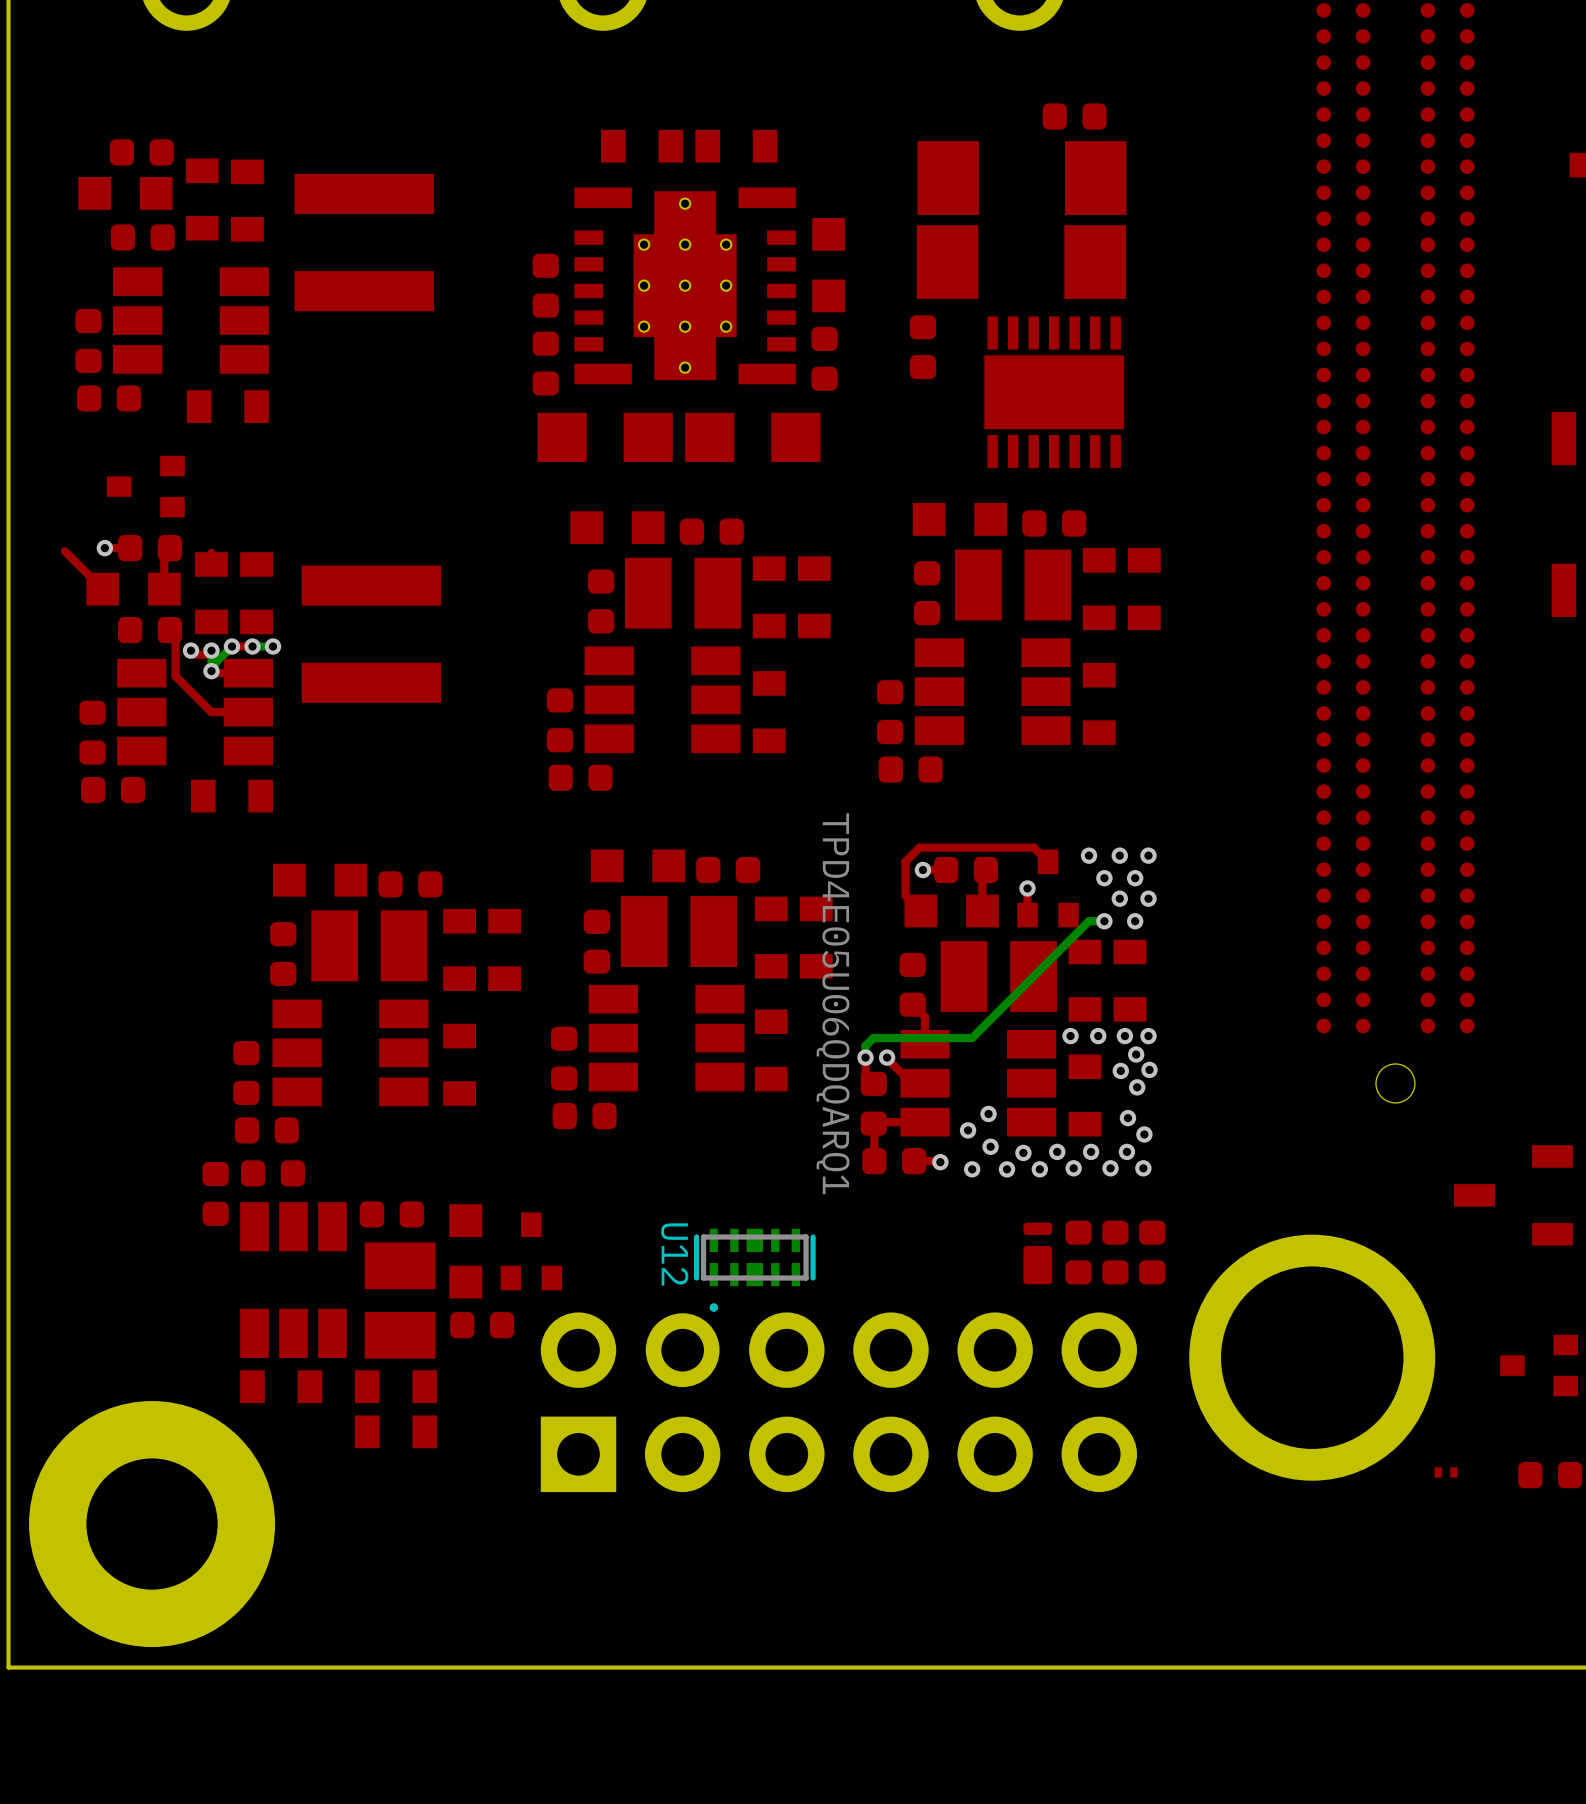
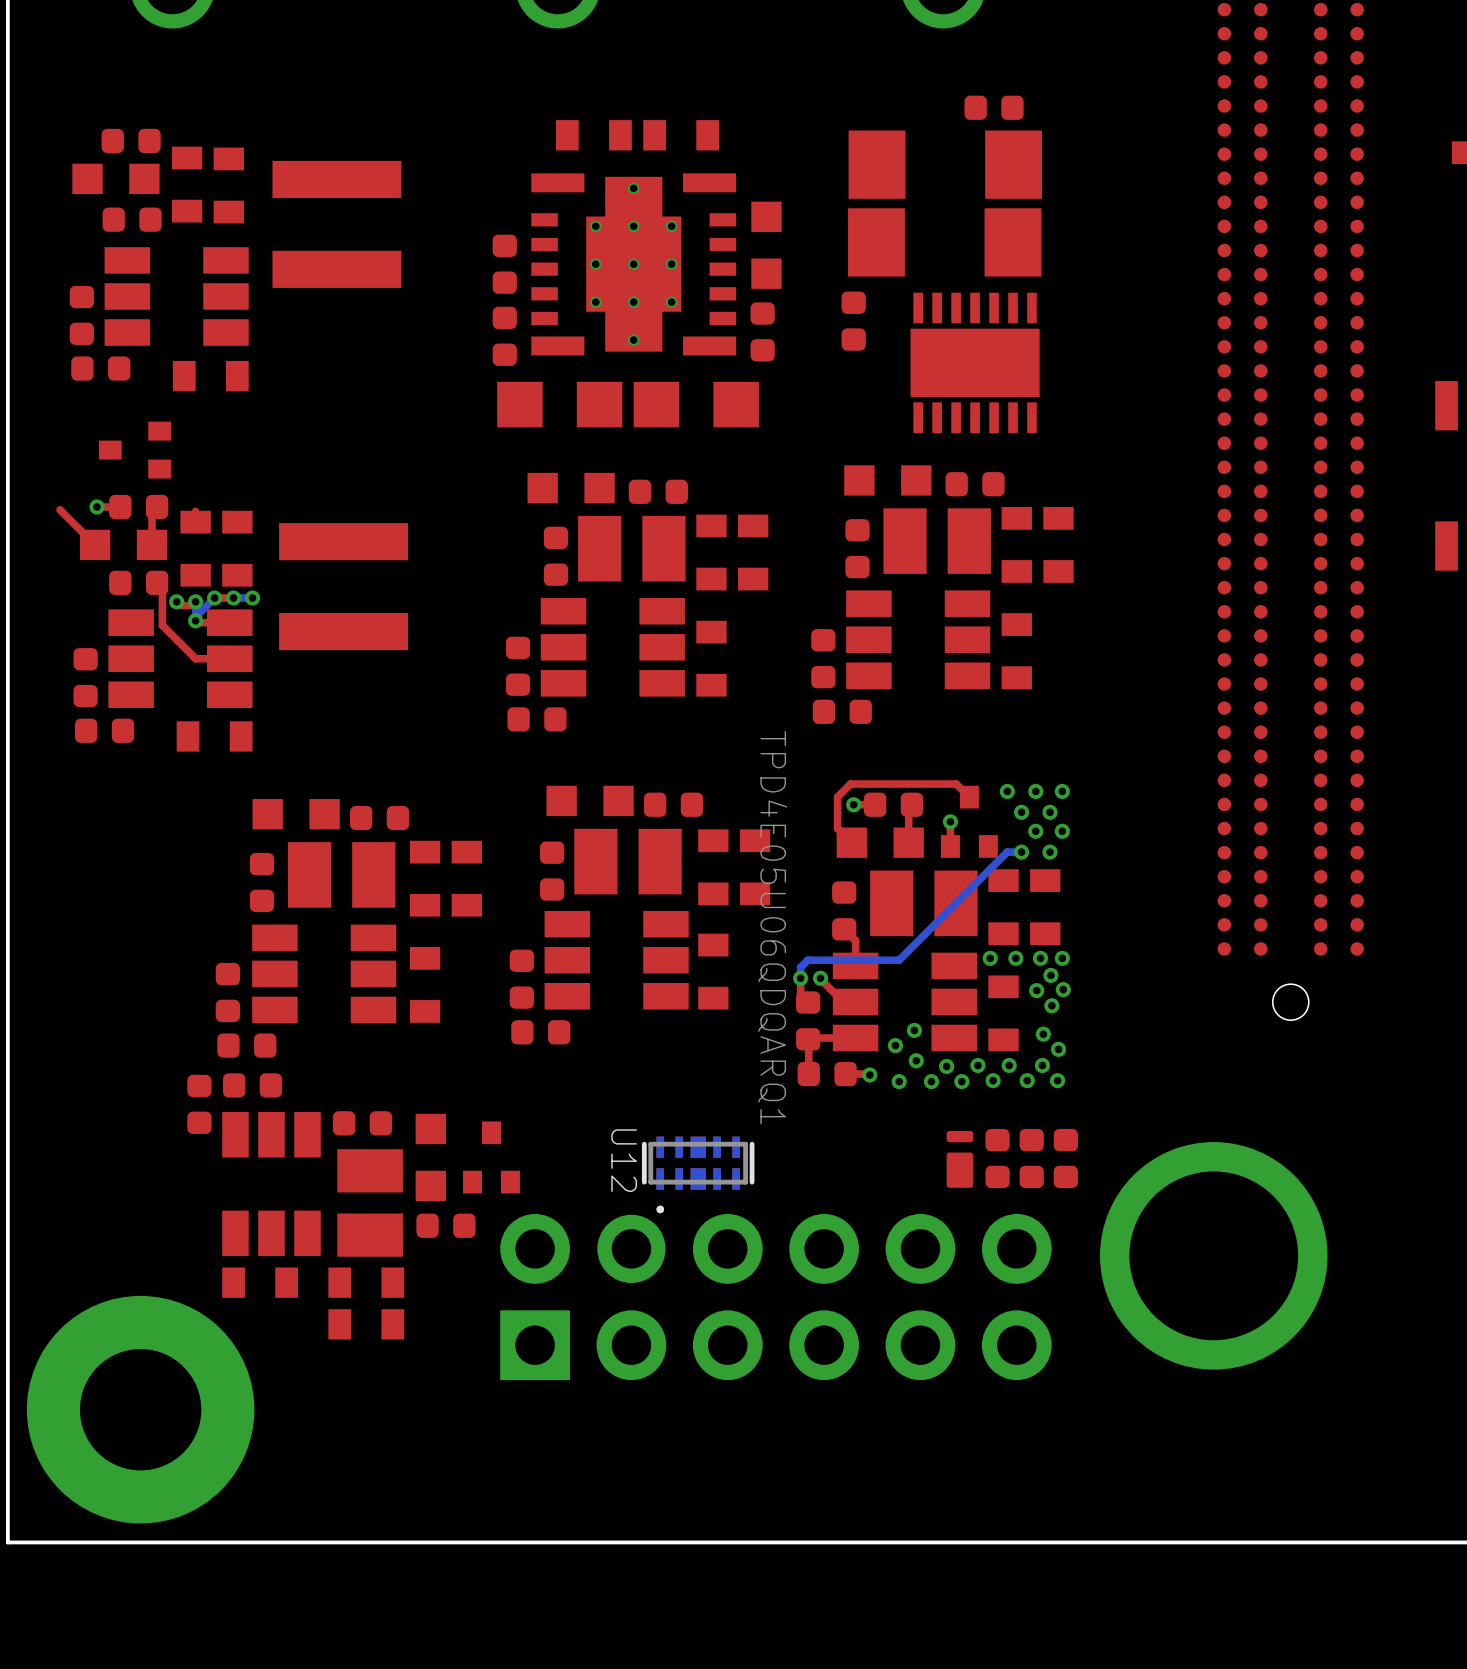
part: (1513, 1195) -> none
part: (1539, 1365) -> none
part: (1446, 1472) -> none
part: (1550, 1475) -> none

